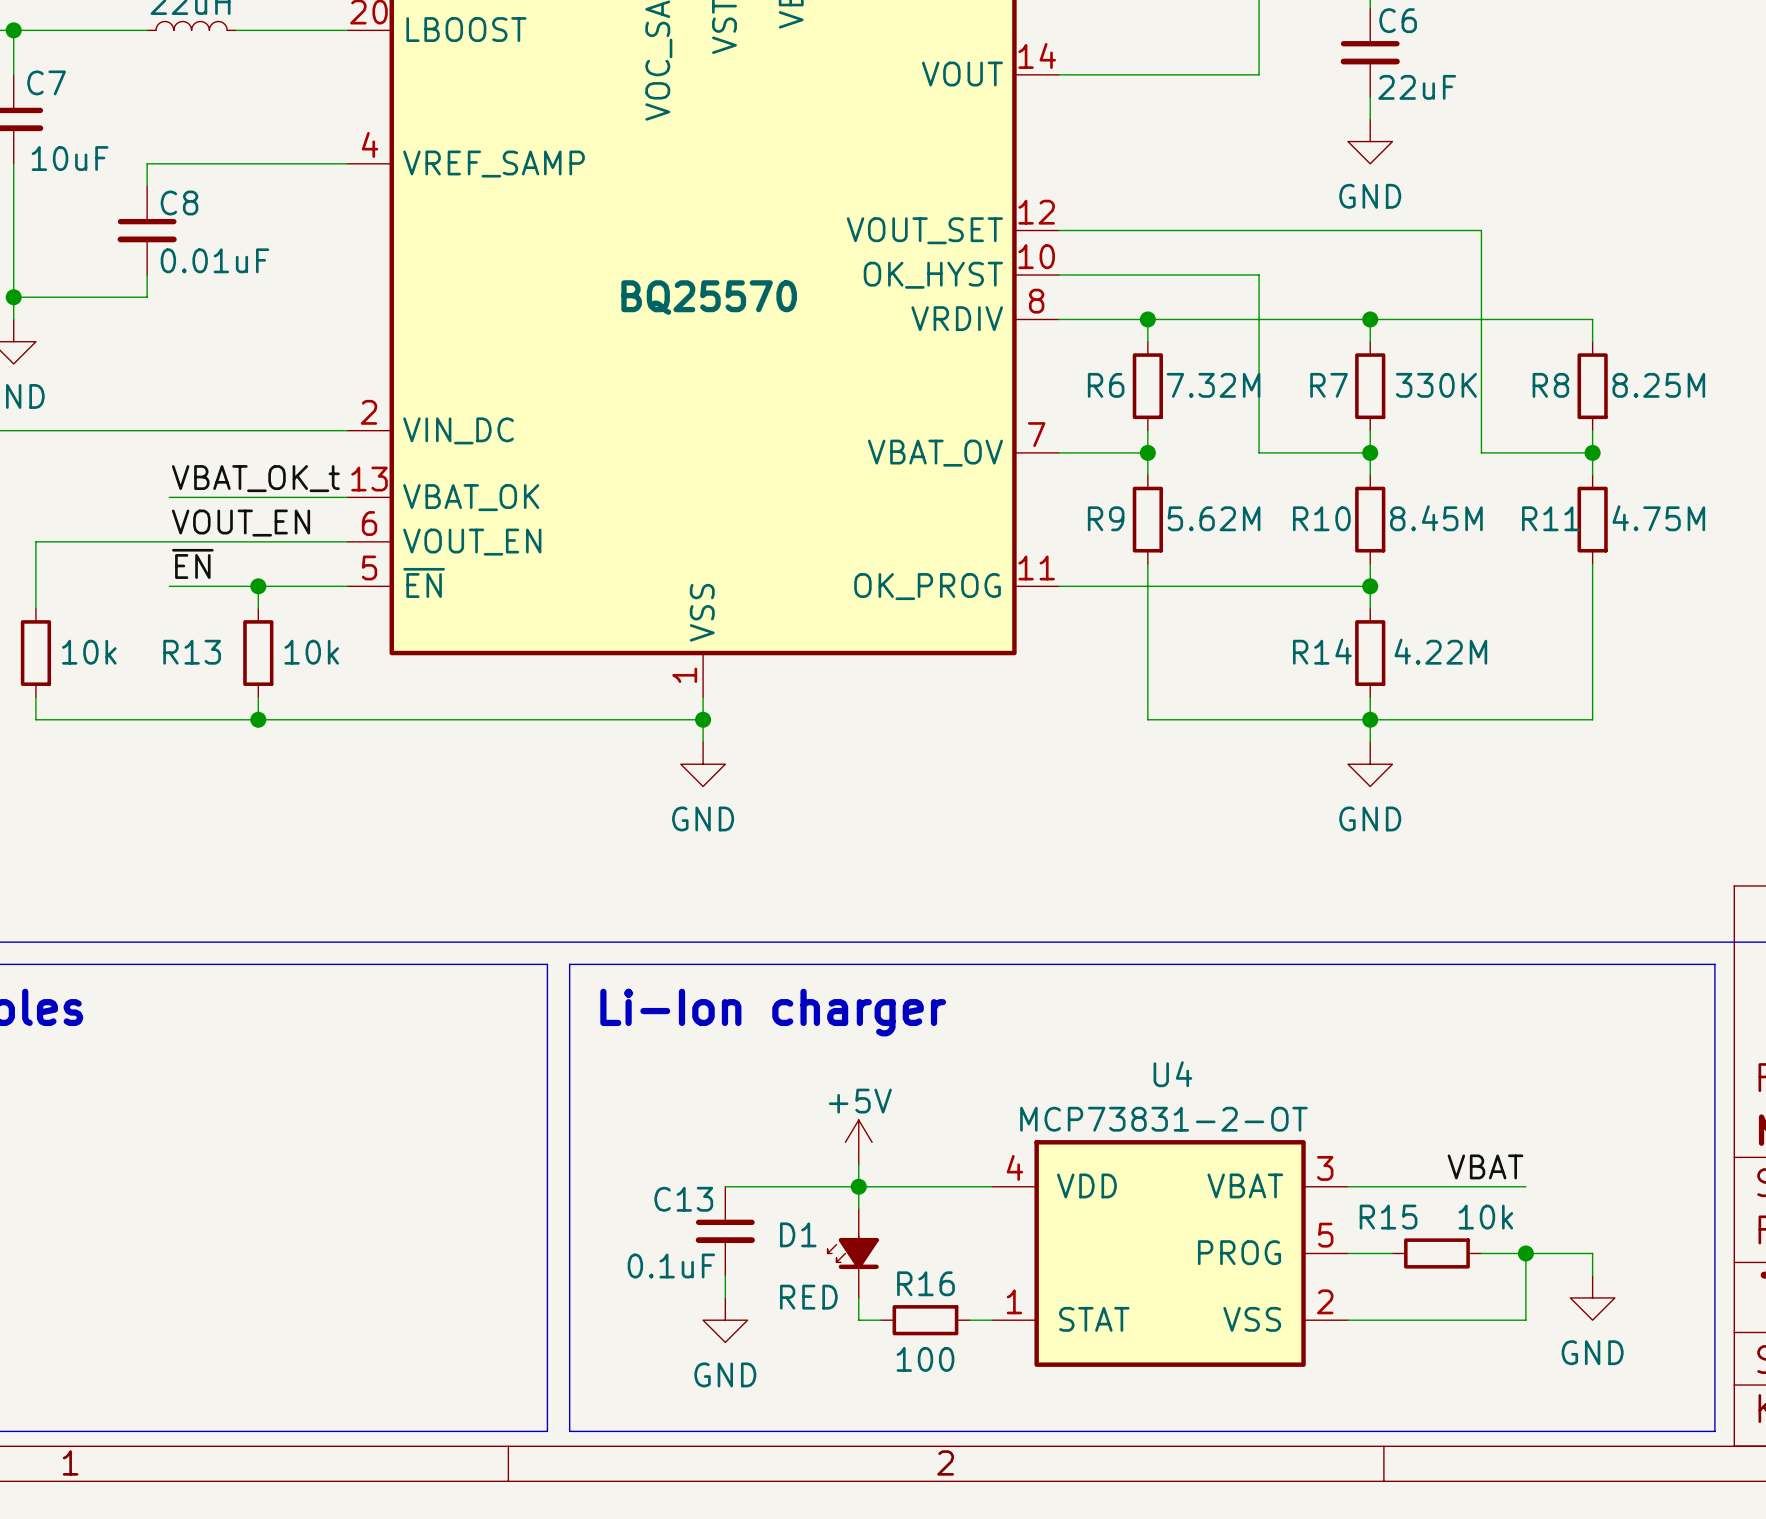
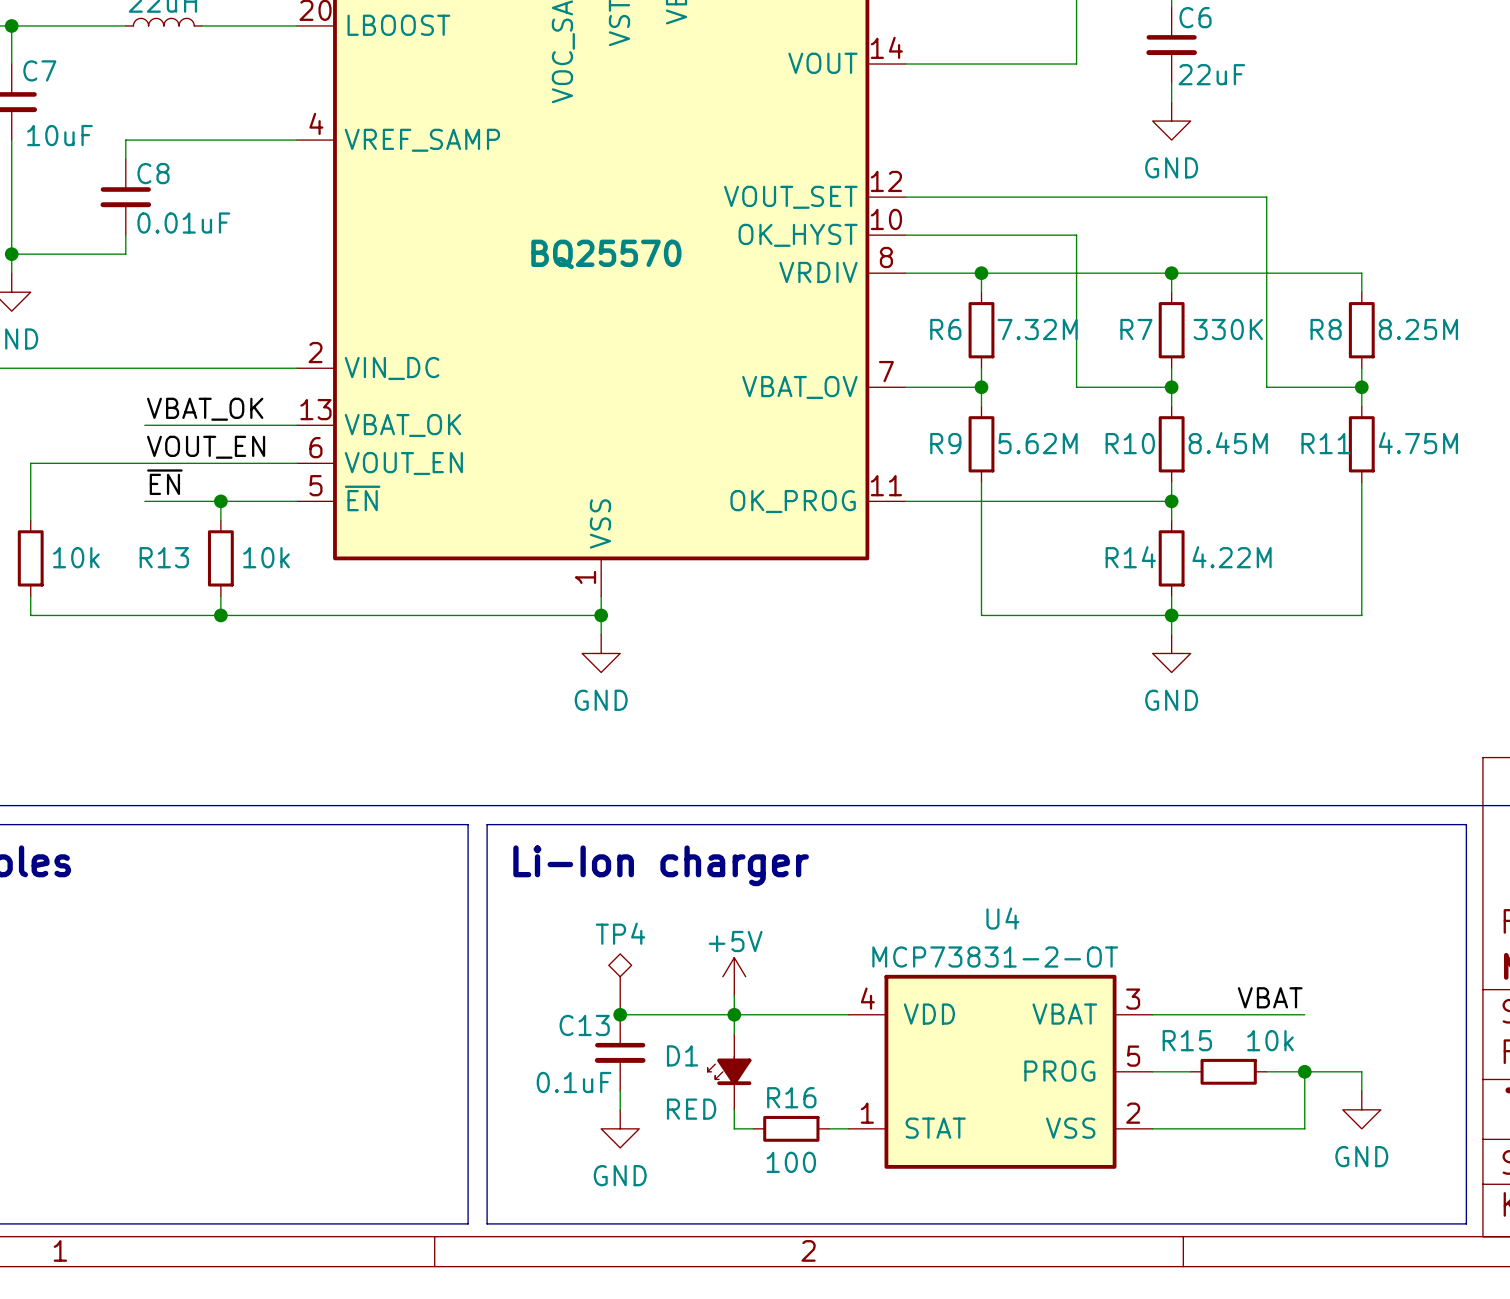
label: VBAT_OK_t (255, 478) -> VBAT_OK (205, 409)
TP4: none -> (620, 984)
junction: none -> (620, 1014)

